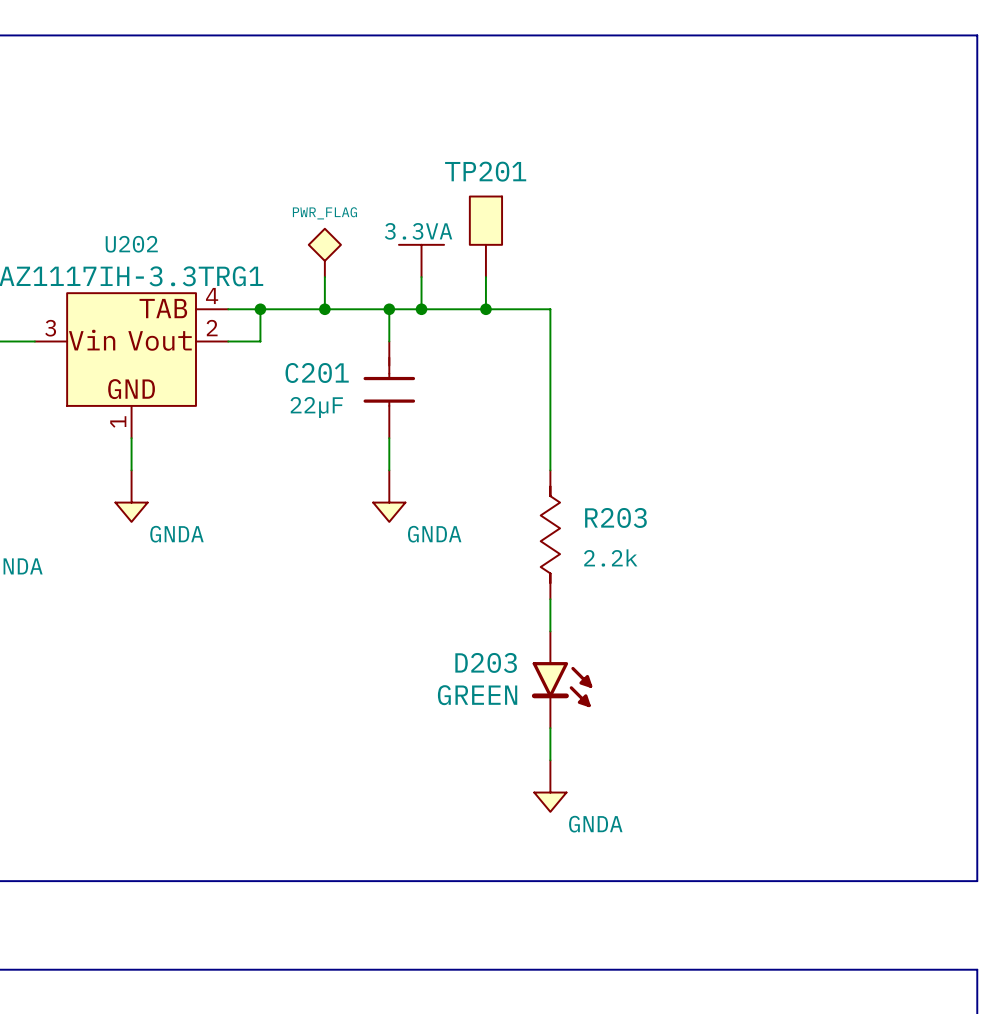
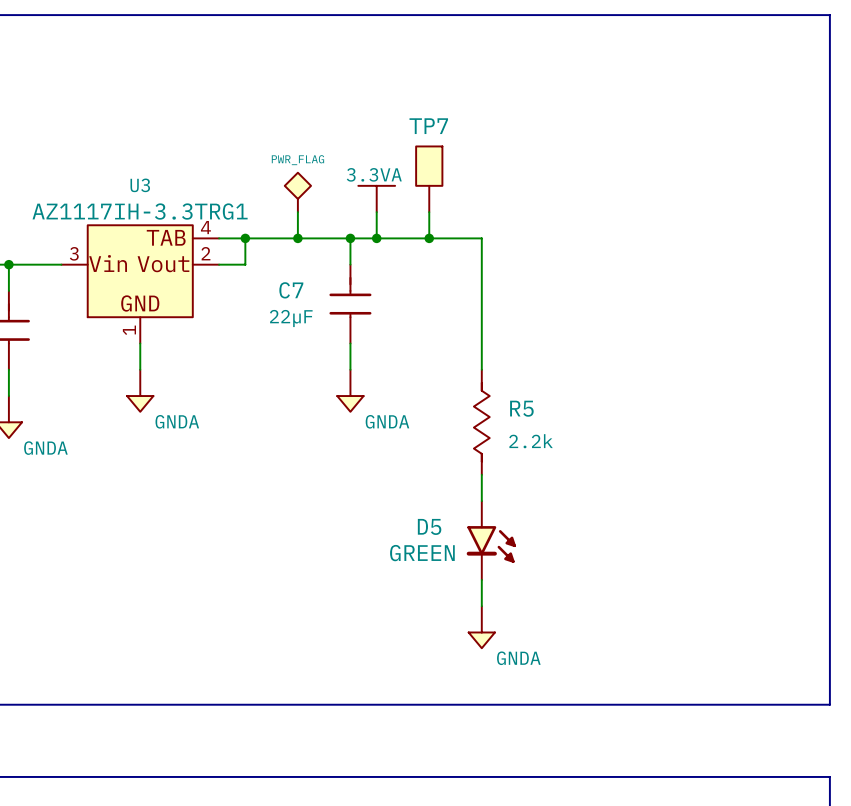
TP201 name: TP201 (485, 171) -> TP7 (428, 126)
U202 name: U202 (131, 244) -> U3 (140, 185)
C201 name: C201 (317, 372) -> C7 (291, 290)
R203 name: R203 (615, 517) -> R5 (521, 408)
D203 name: D203 (486, 662) -> D5 (429, 526)

